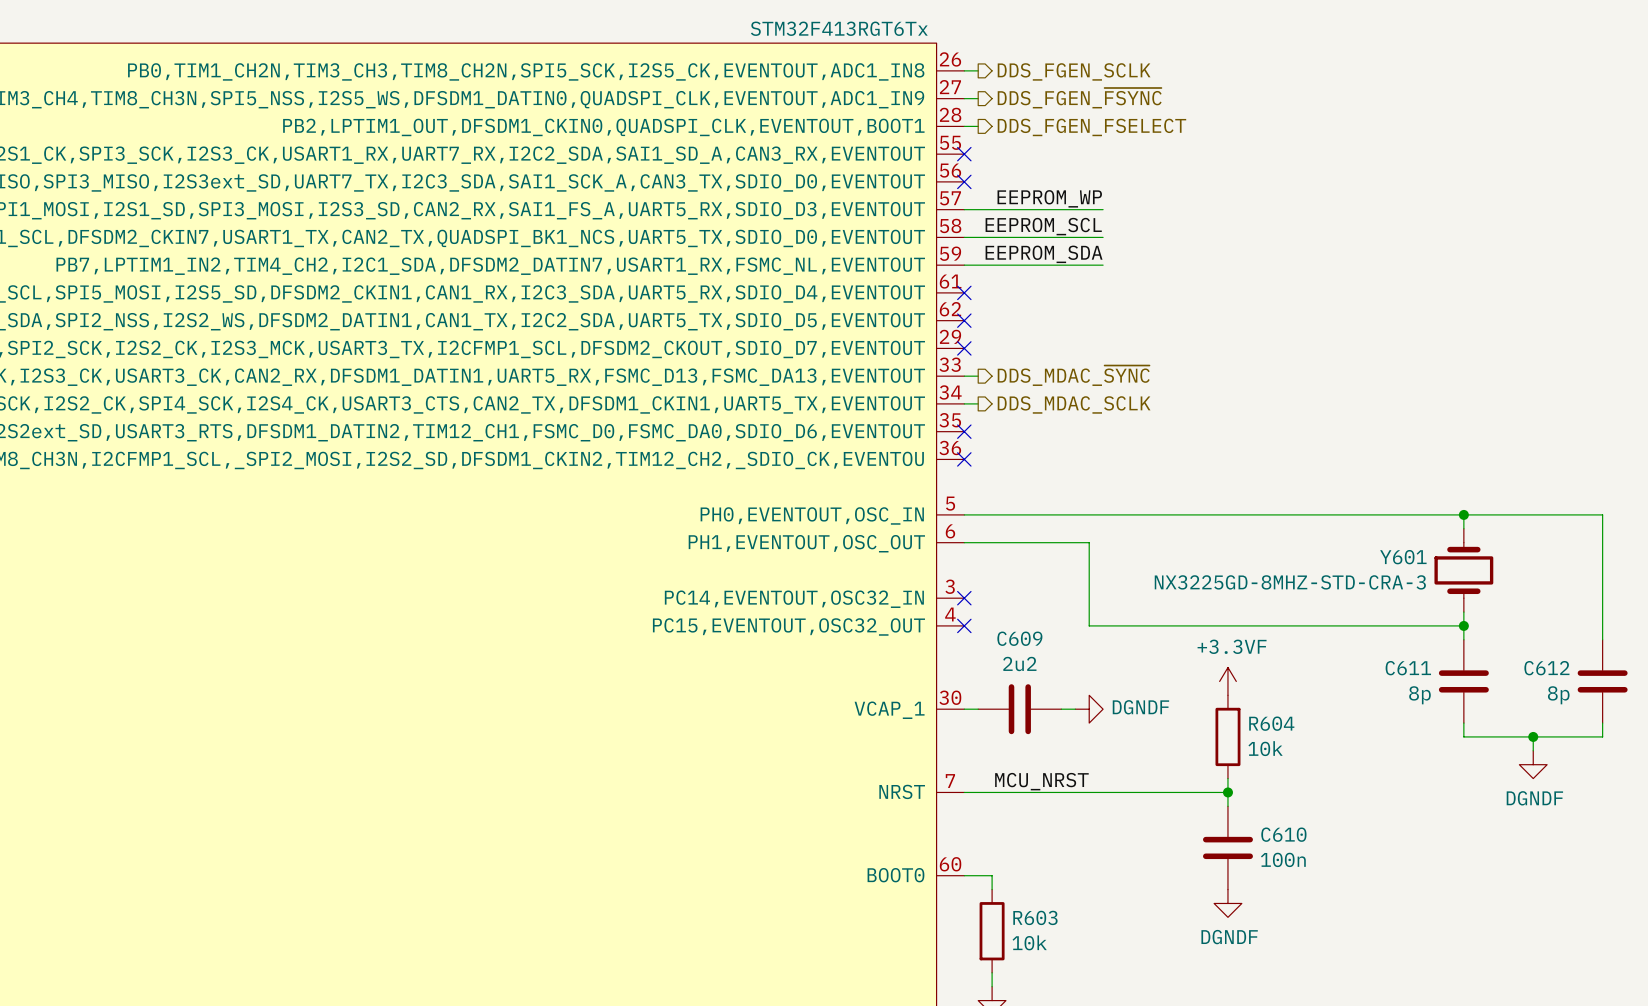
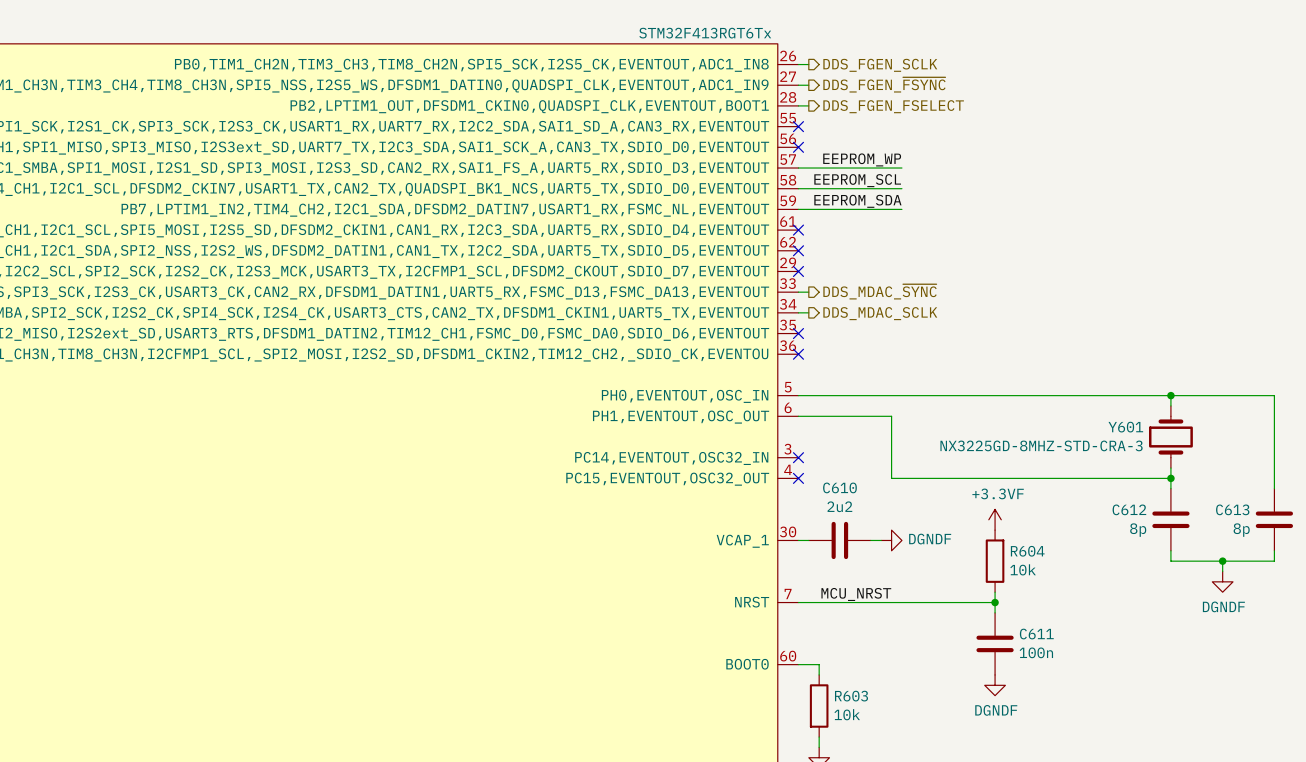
C609 name: C609 (1019, 638) -> C610 (839, 487)
C611 name: C611 (1408, 668) -> C612 (1129, 509)
C612 name: C612 (1546, 668) -> C613 (1232, 509)
C610 name: C610 (1283, 834) -> C611 (1036, 634)

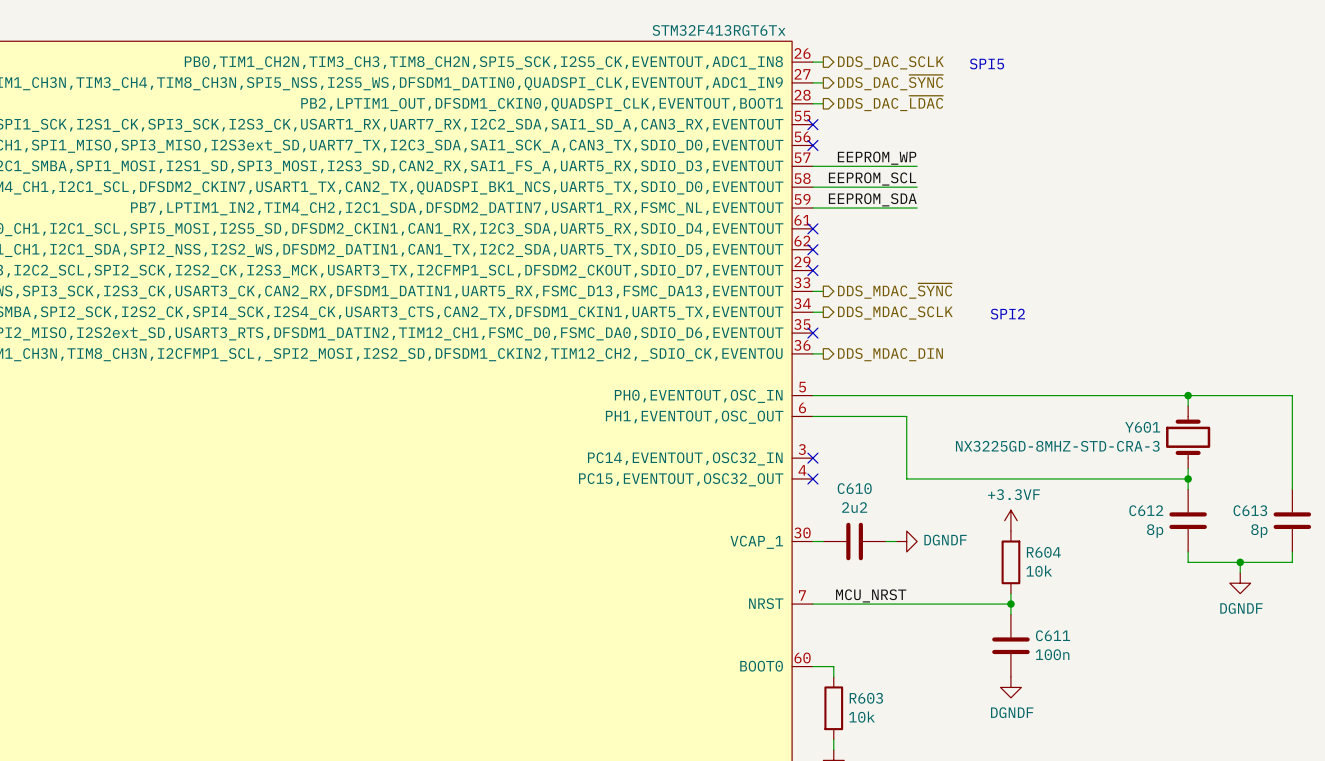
hierarchical label: DDS_FGEN_SCLK (880, 65) -> DDS_DAC_SCLK (890, 62)
text: none -> SPI5 (987, 63)
hierarchical label: DDS_FGEN_~{FSYNC} (884, 84) -> DDS_DAC_~{SYNC} (890, 82)
hierarchical label: DDS_FGEN_FSELECT (893, 106) -> DDS_DAC_~{LDAC} (890, 103)
text: none -> SPI2 (1007, 314)
wire: none -> (812, 353) (823, 353)
no-connect mark: (798, 354) -> none
hierarchical label: none -> DDS_MDAC_DIN (890, 354)

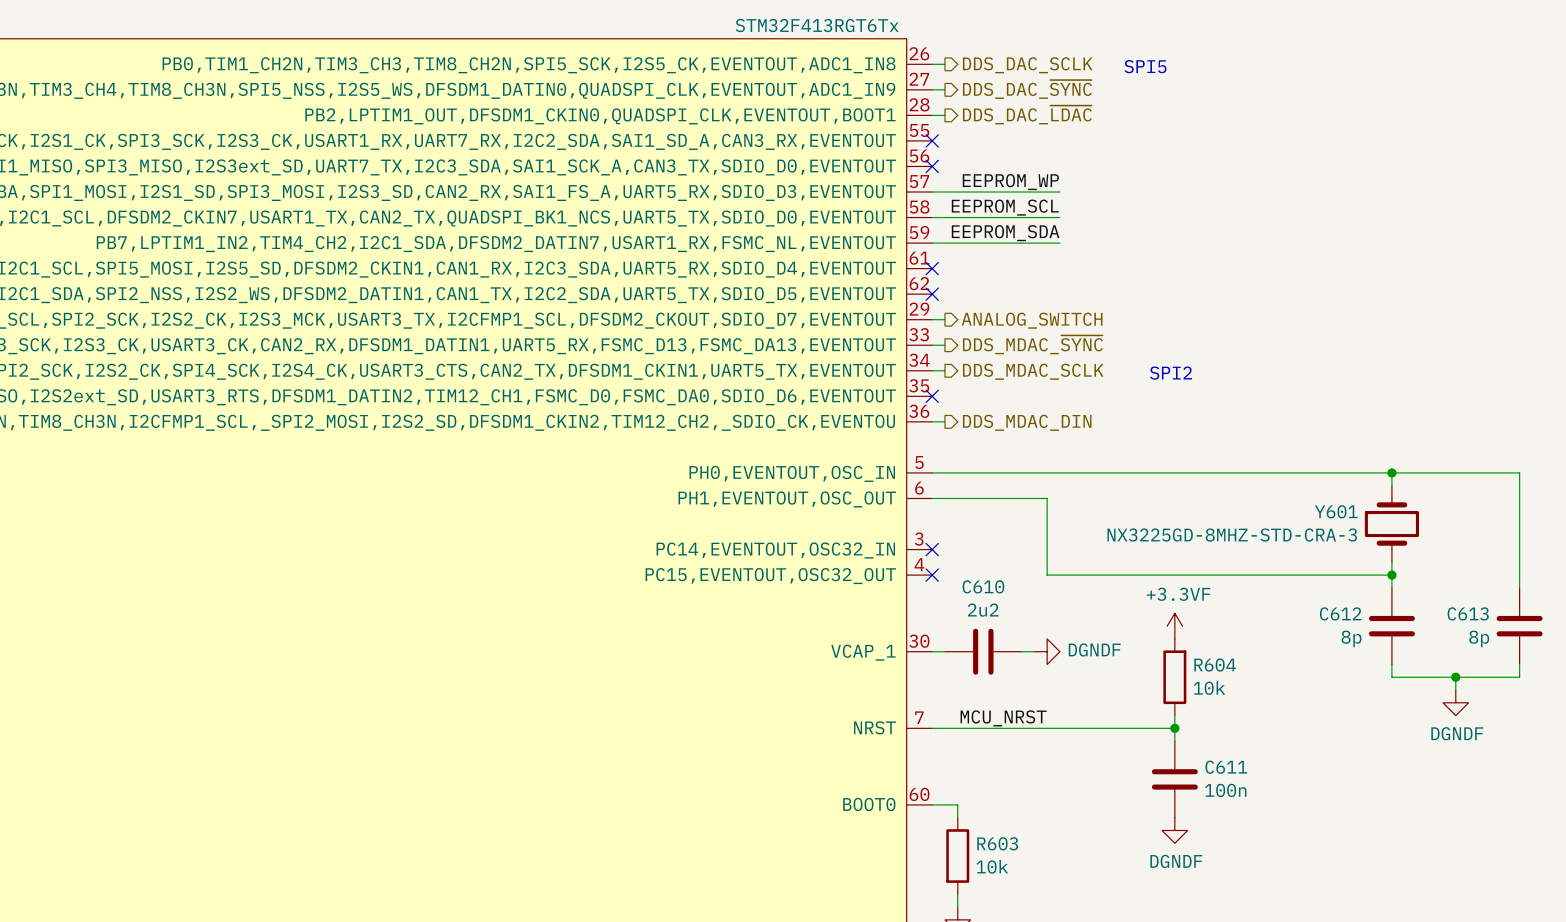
wire: none -> (932, 319) (944, 319)
no-connect mark: (812, 270) -> none
hierarchical label: none -> ANALOG_SWITCH (1032, 320)

